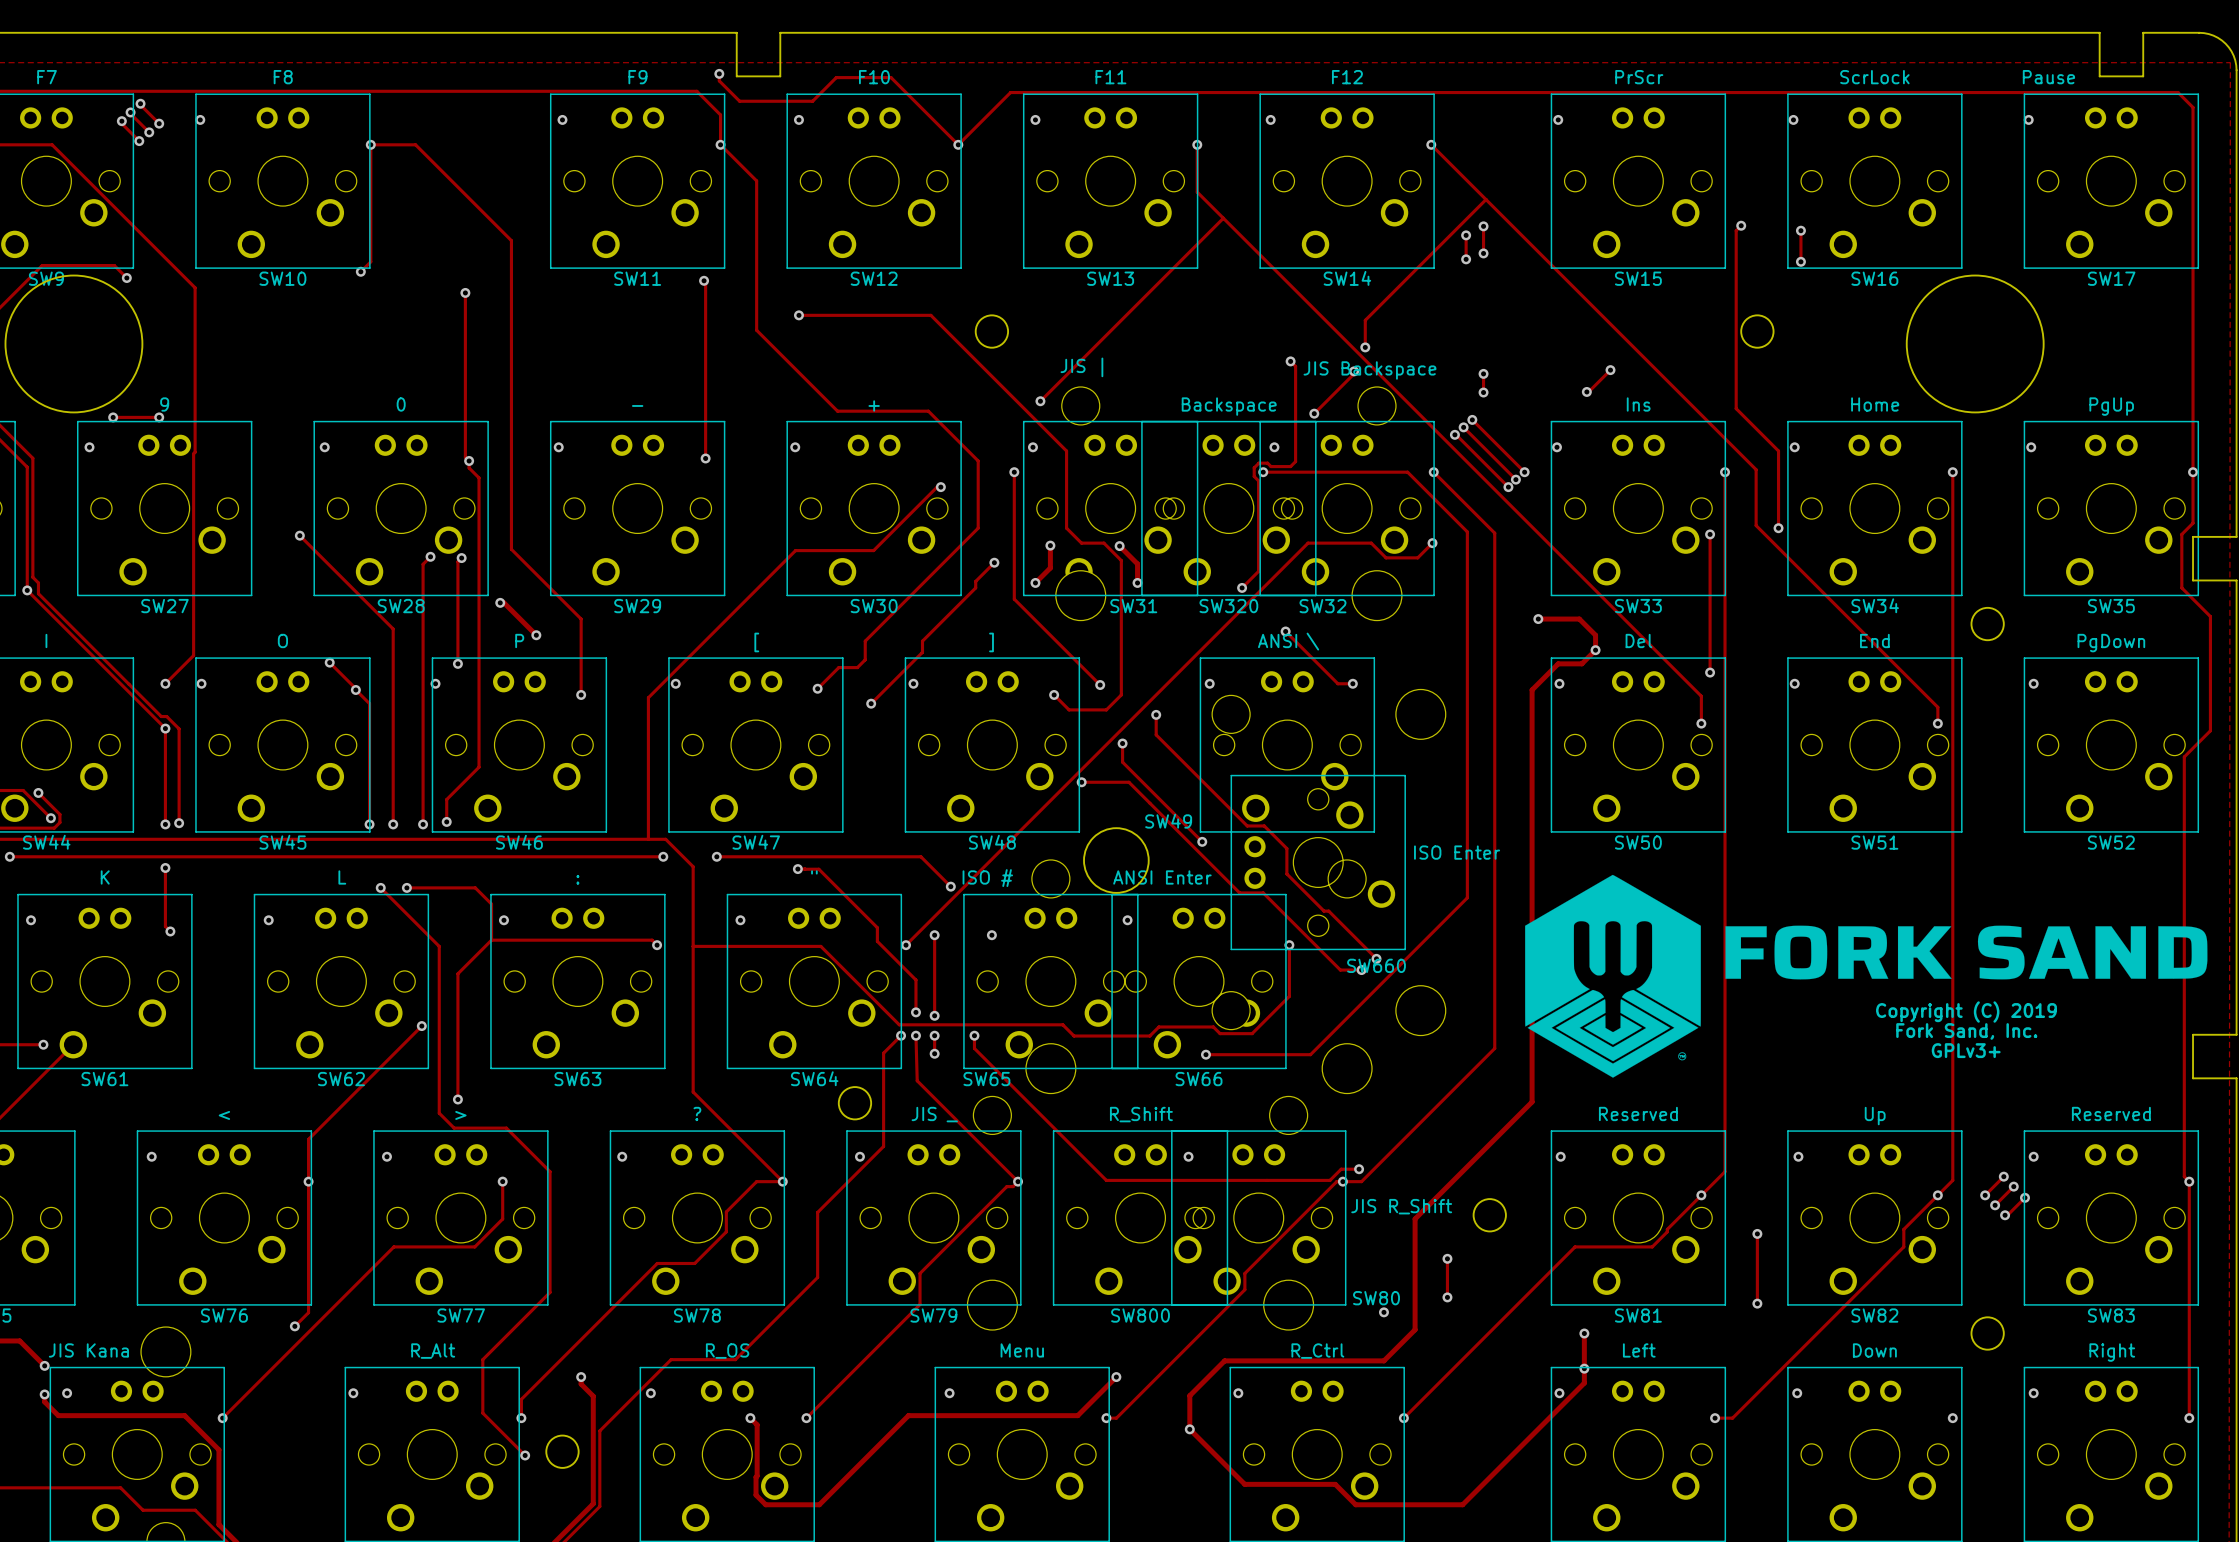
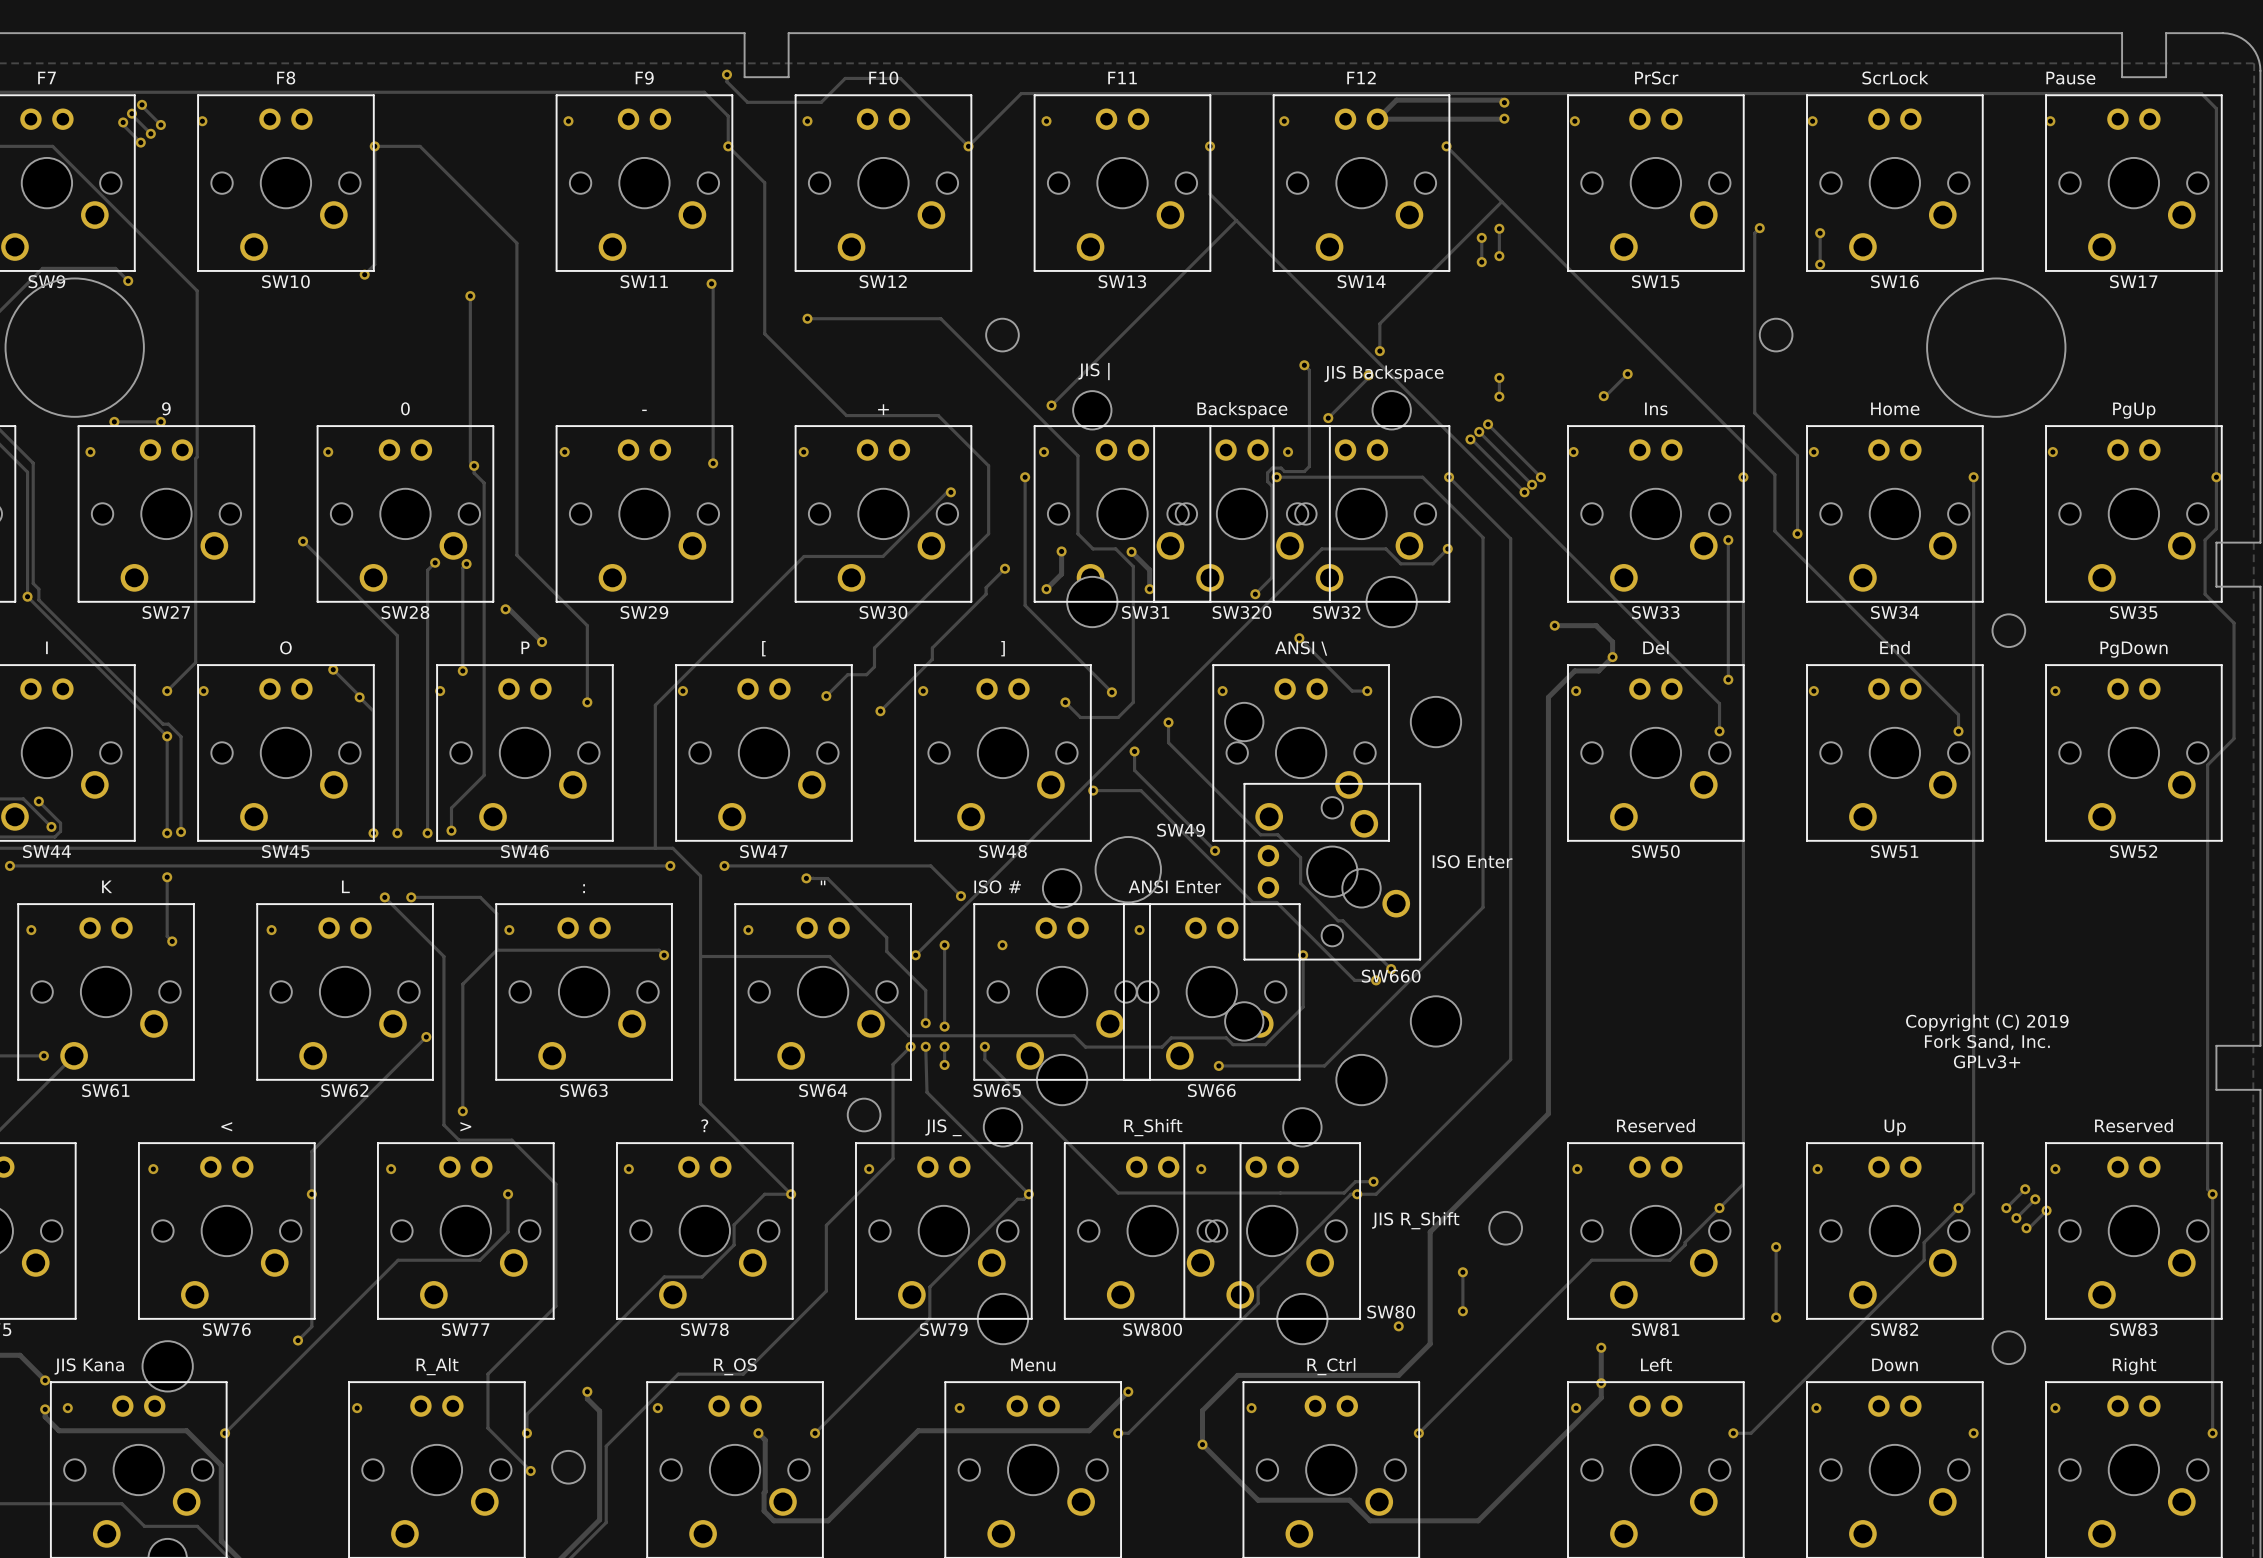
track: none -> (1504, 102) (1501, 100) (1396, 100) (1377, 119) (1504, 118)
via: none -> (1504, 102)
via: none -> (1504, 118)
drawing: [1525, 874, 1701, 1078] -> none
drawing: [1725, 925, 2208, 980] -> none

